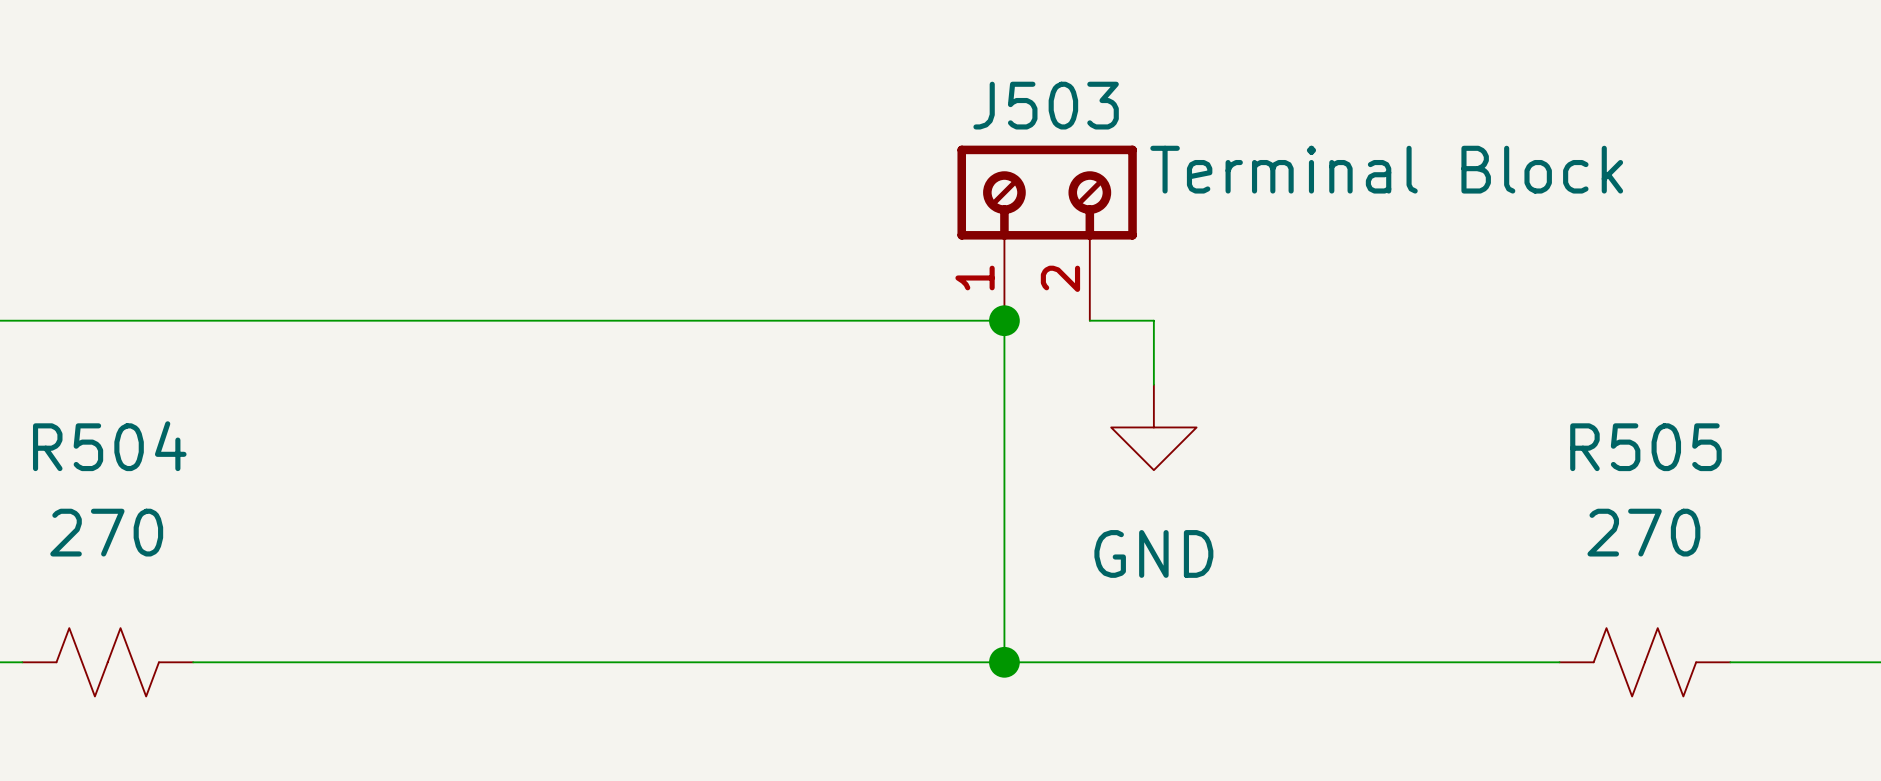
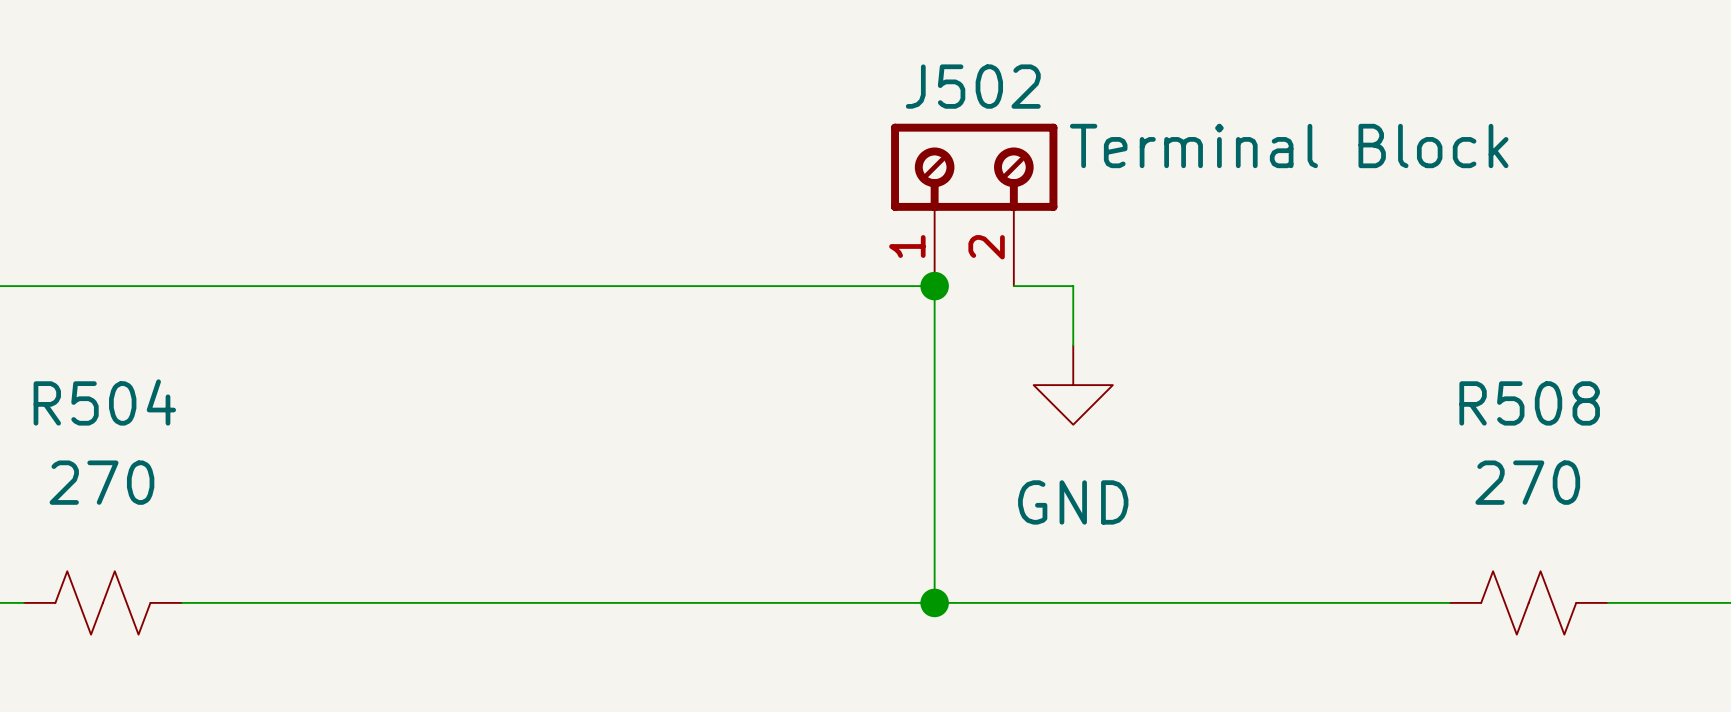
J503 name: J503 (1046, 105) -> J502 (973, 86)
R505 name: R505 (1645, 447) -> R508 (1529, 403)

